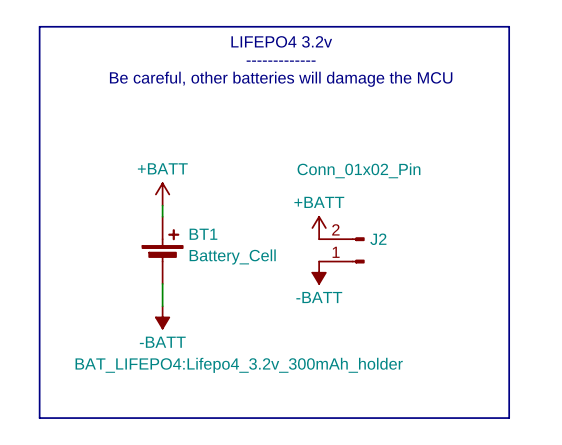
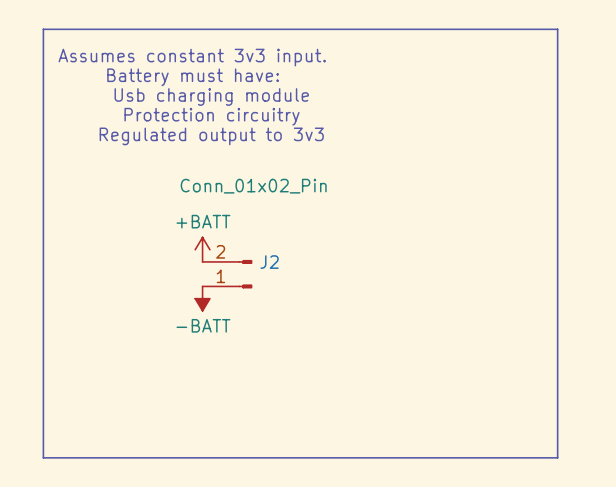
text: LIFEPO4 3.2v (281, 41) -> none
text: none -> Assumes constant 3v3 input. (192, 57)
text: ------------- (281, 61) -> none
text: none -> Battery must have: (193, 77)
text: Be careful, other batteries will damage the MCU (281, 79) -> none
text: none -> Usb charging module (211, 97)
text: none -> Protection circuitry (212, 116)
text: none -> Regulated output to 3v3 (211, 136)
power symbol position: +BATT (162, 194) -> +BATT (202, 249)
wire: (162, 205) (162, 216) -> none
power symbol: +BATT (319, 228) -> none
BT1: Battery_Cell (162, 250) -> none
J2 position: (341, 250) -> (227, 274)
power symbol: -BATT (319, 272) -> none
wire: (162, 283) (162, 306) -> none
power symbol position: -BATT (162, 317) -> -BATT (202, 298)

